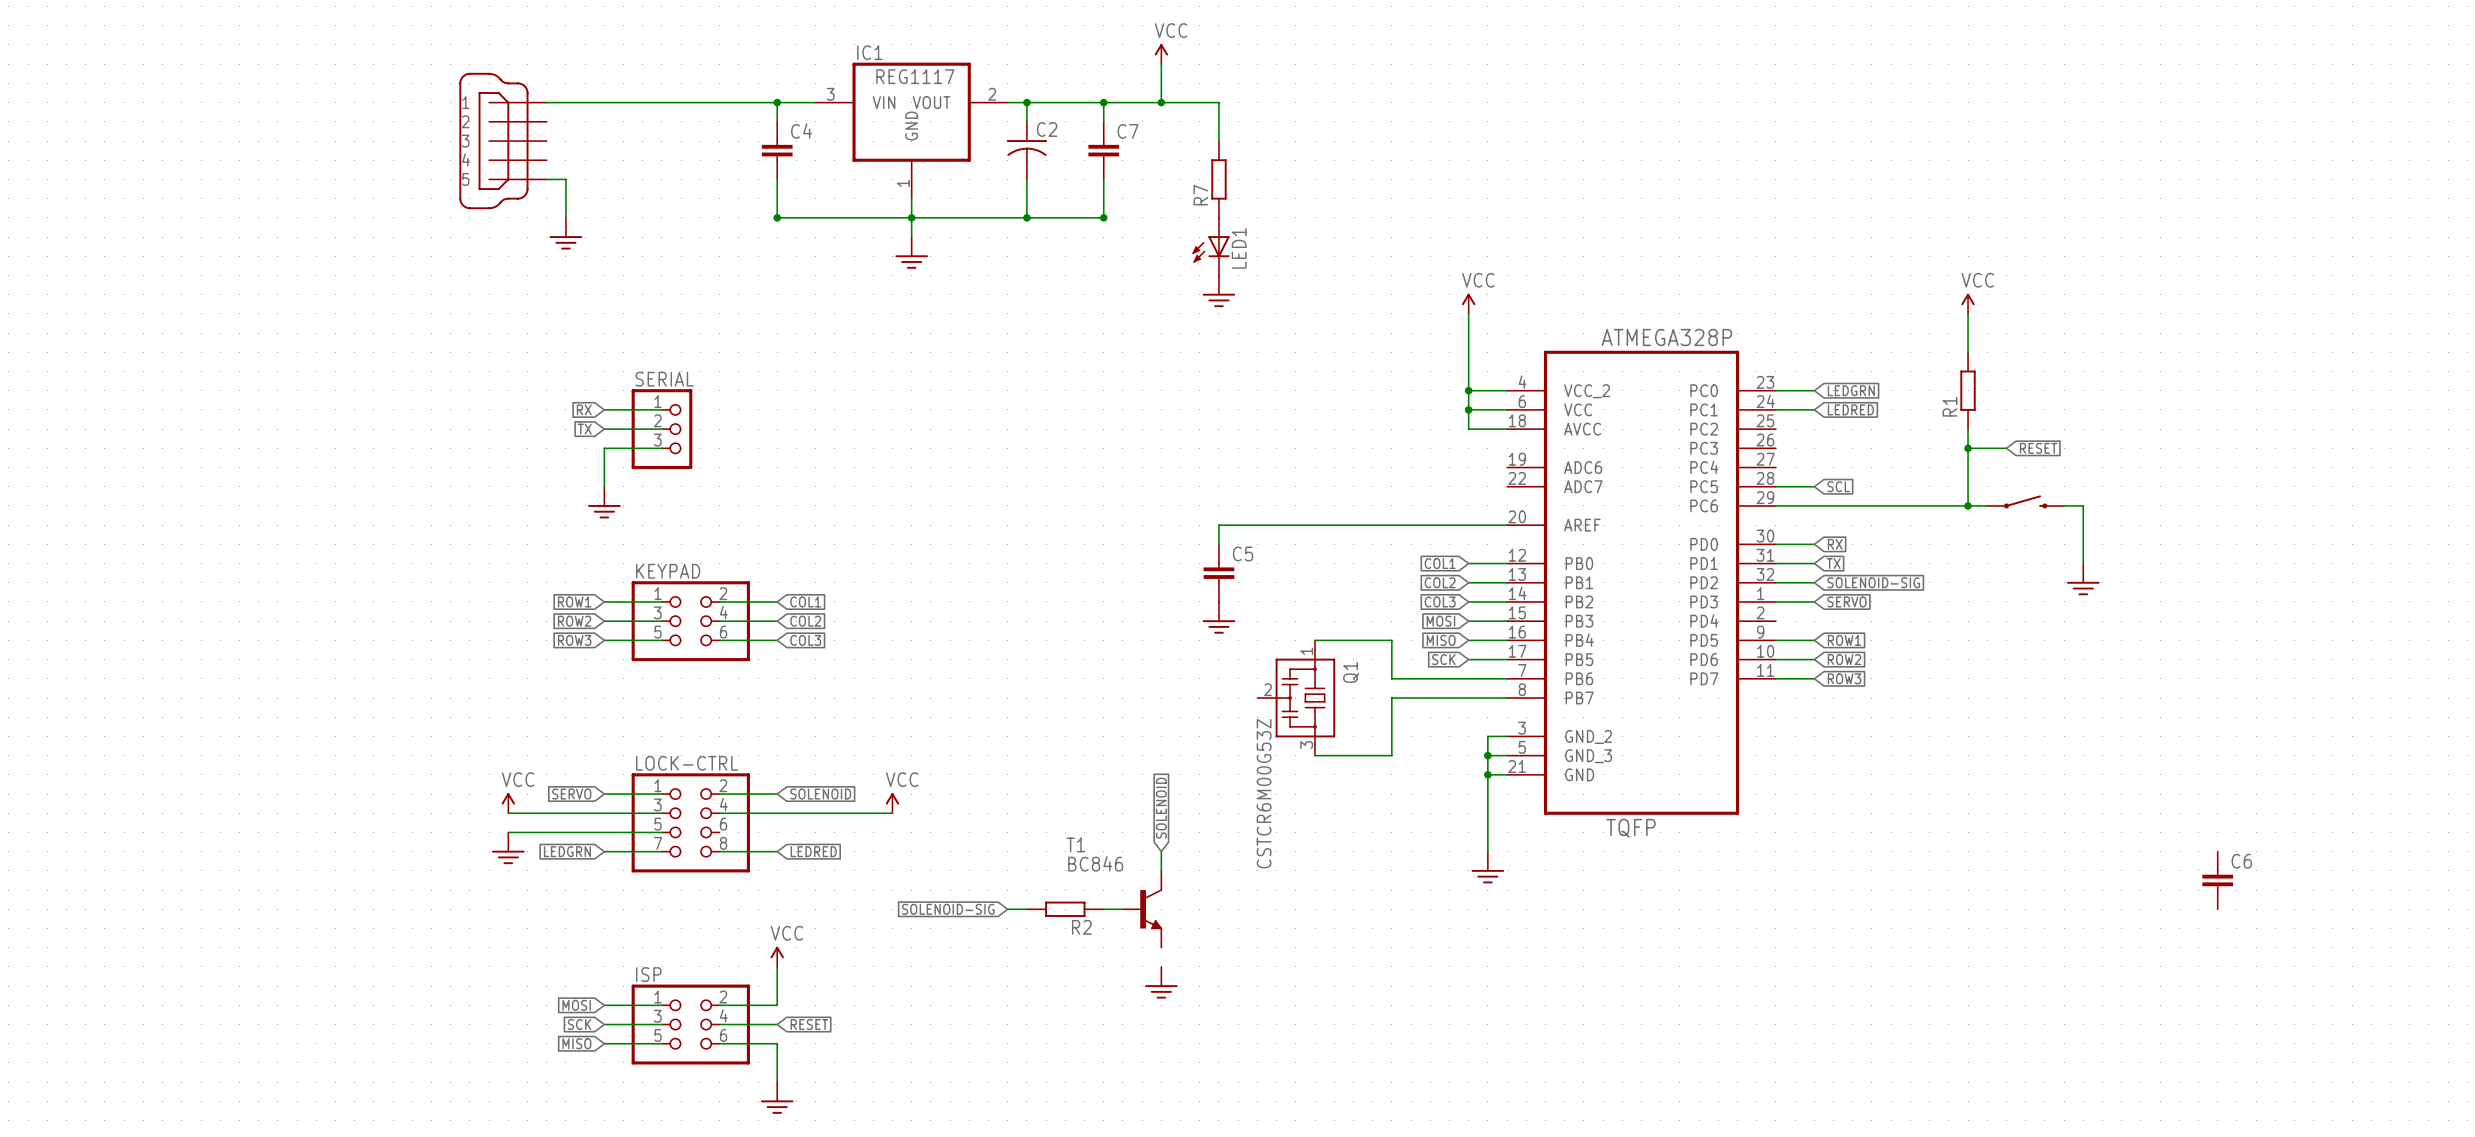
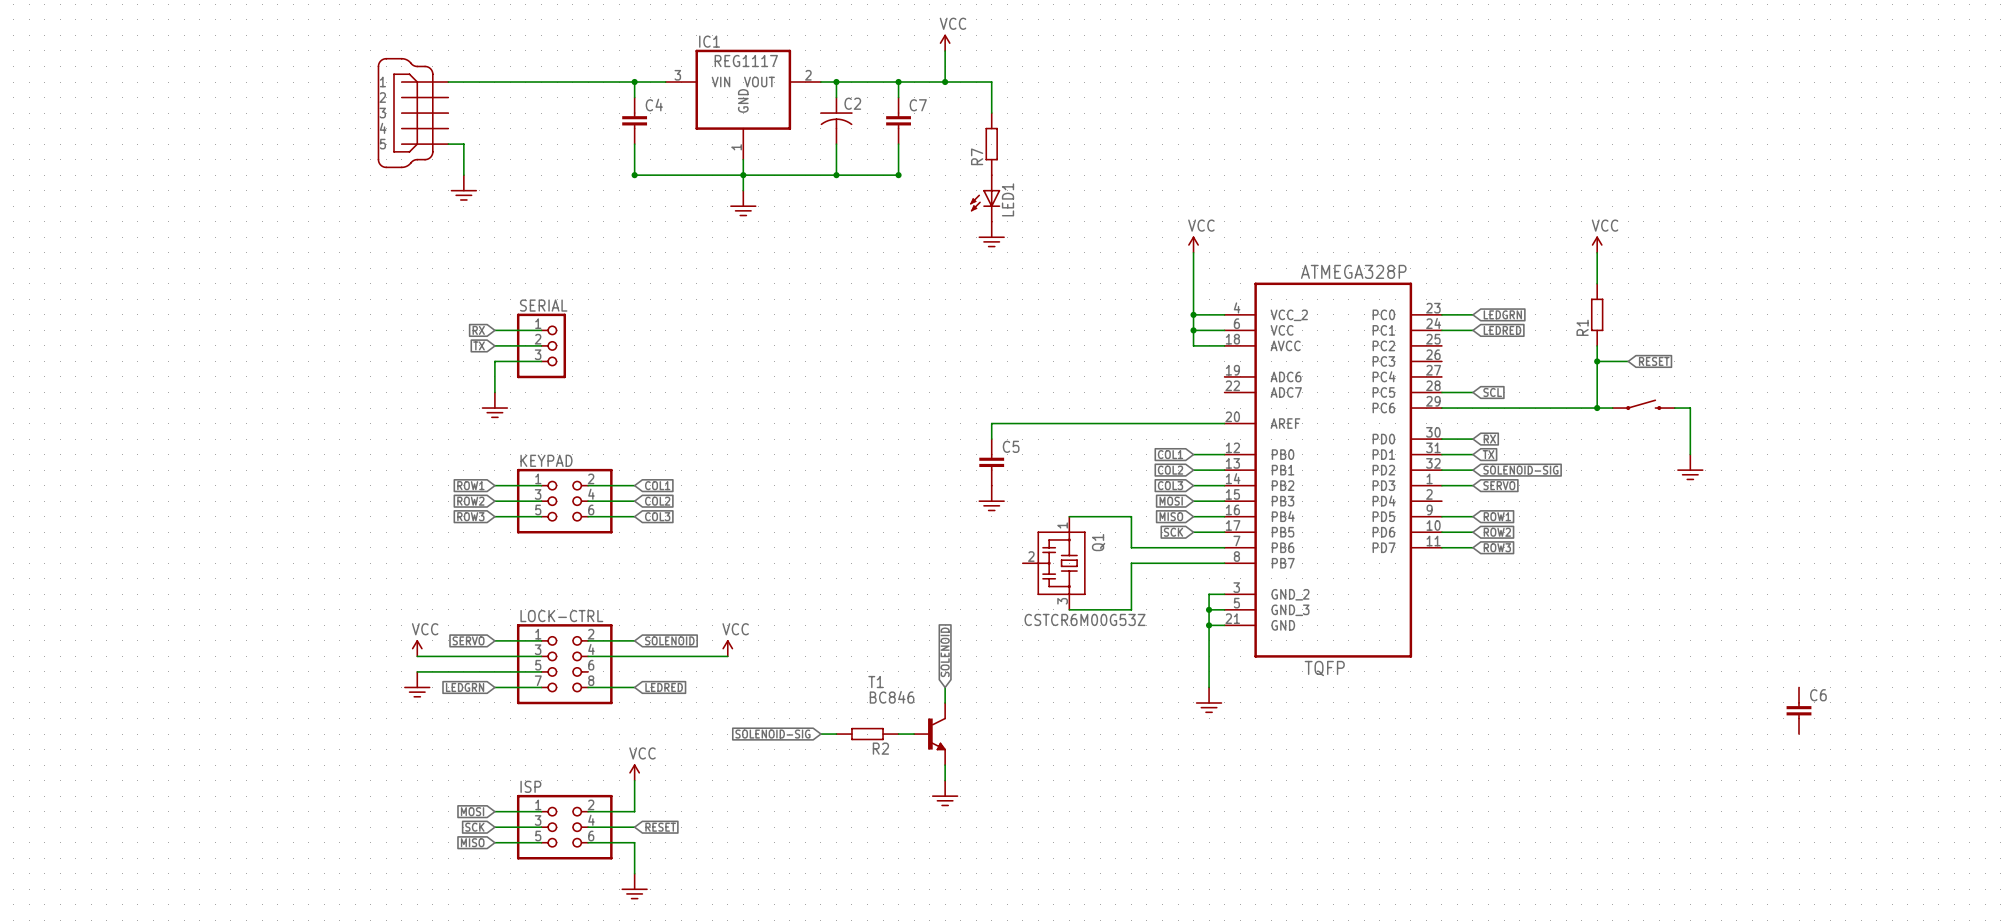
Q1 value rotation: 0° (1264, 793) -> 90° clockwise (1085, 619)
wire: none -> (945, 765) (945, 780)

